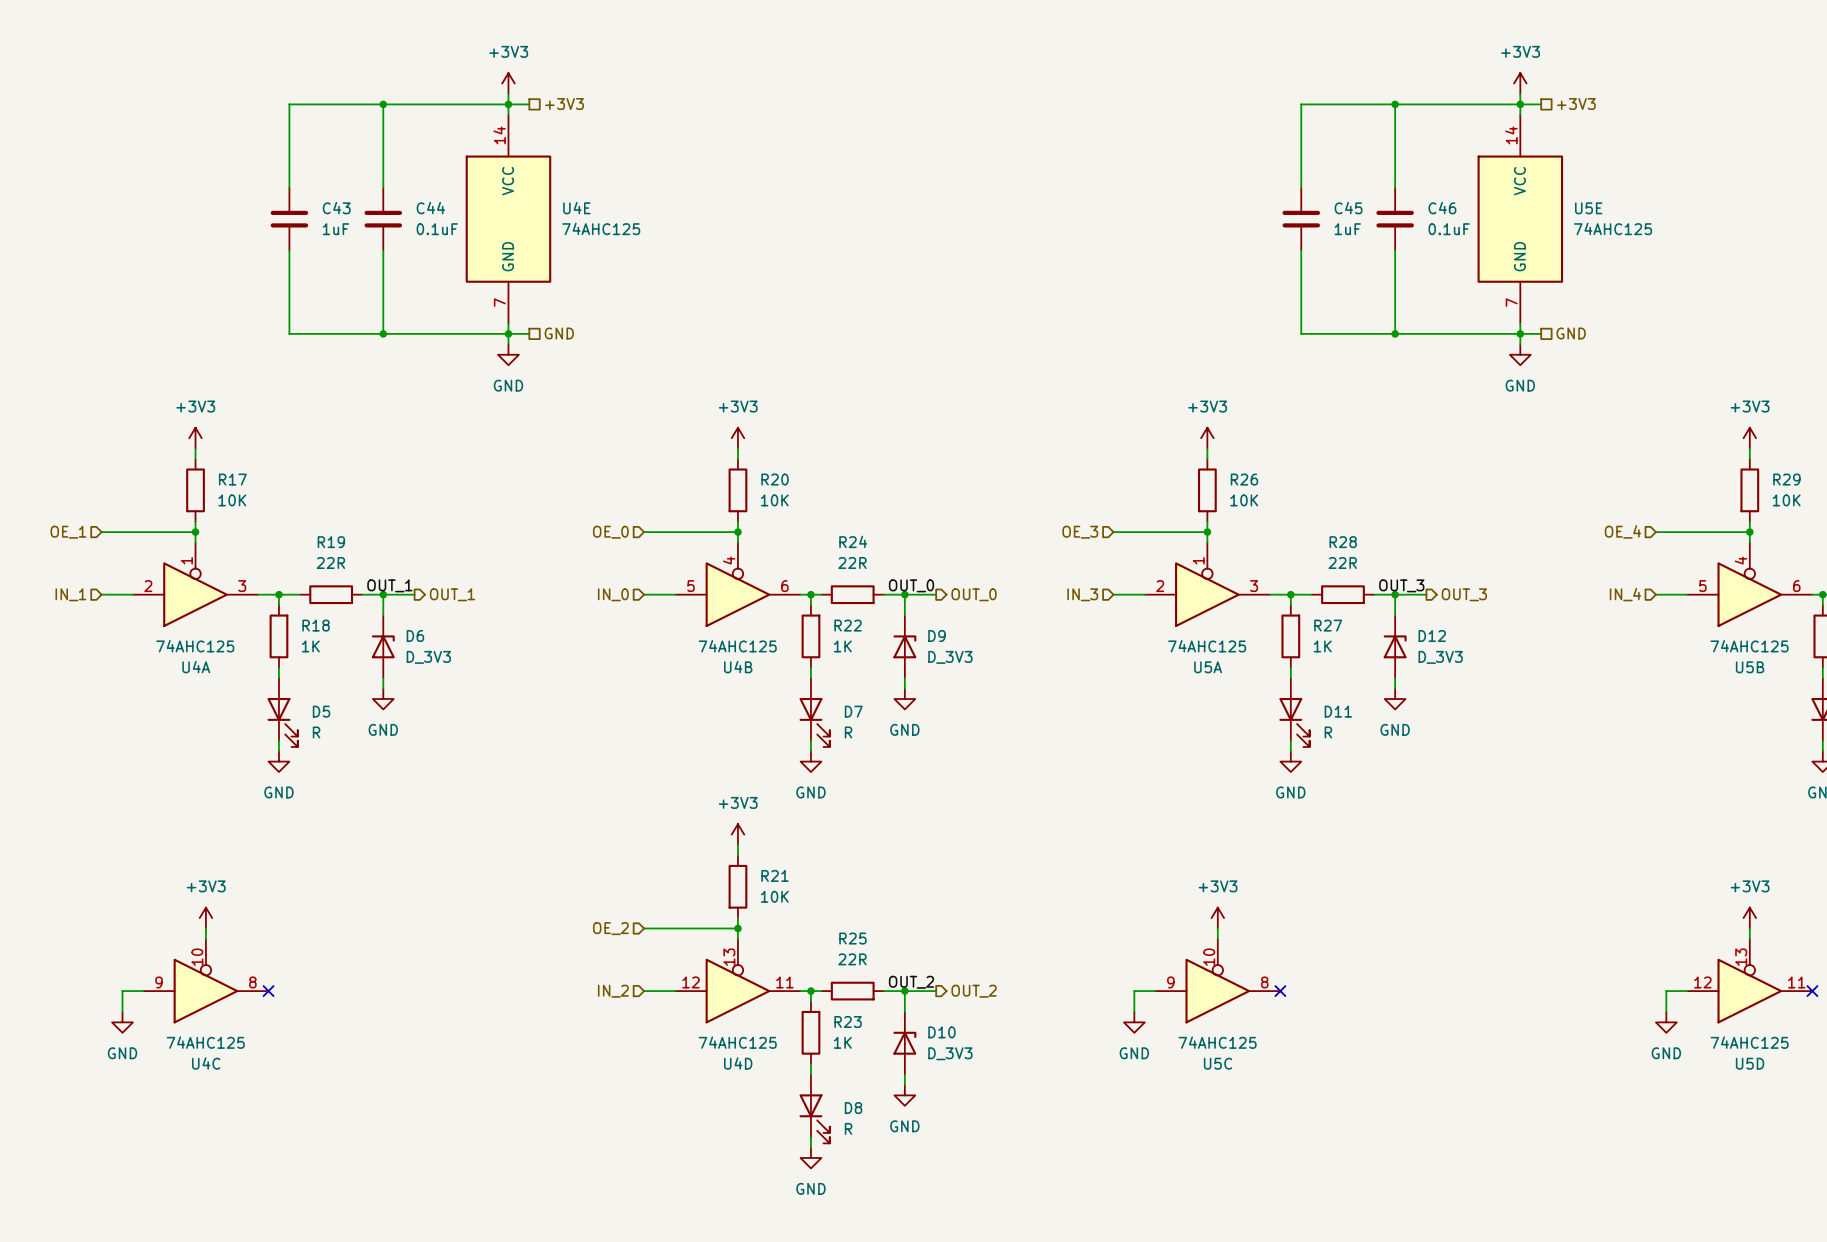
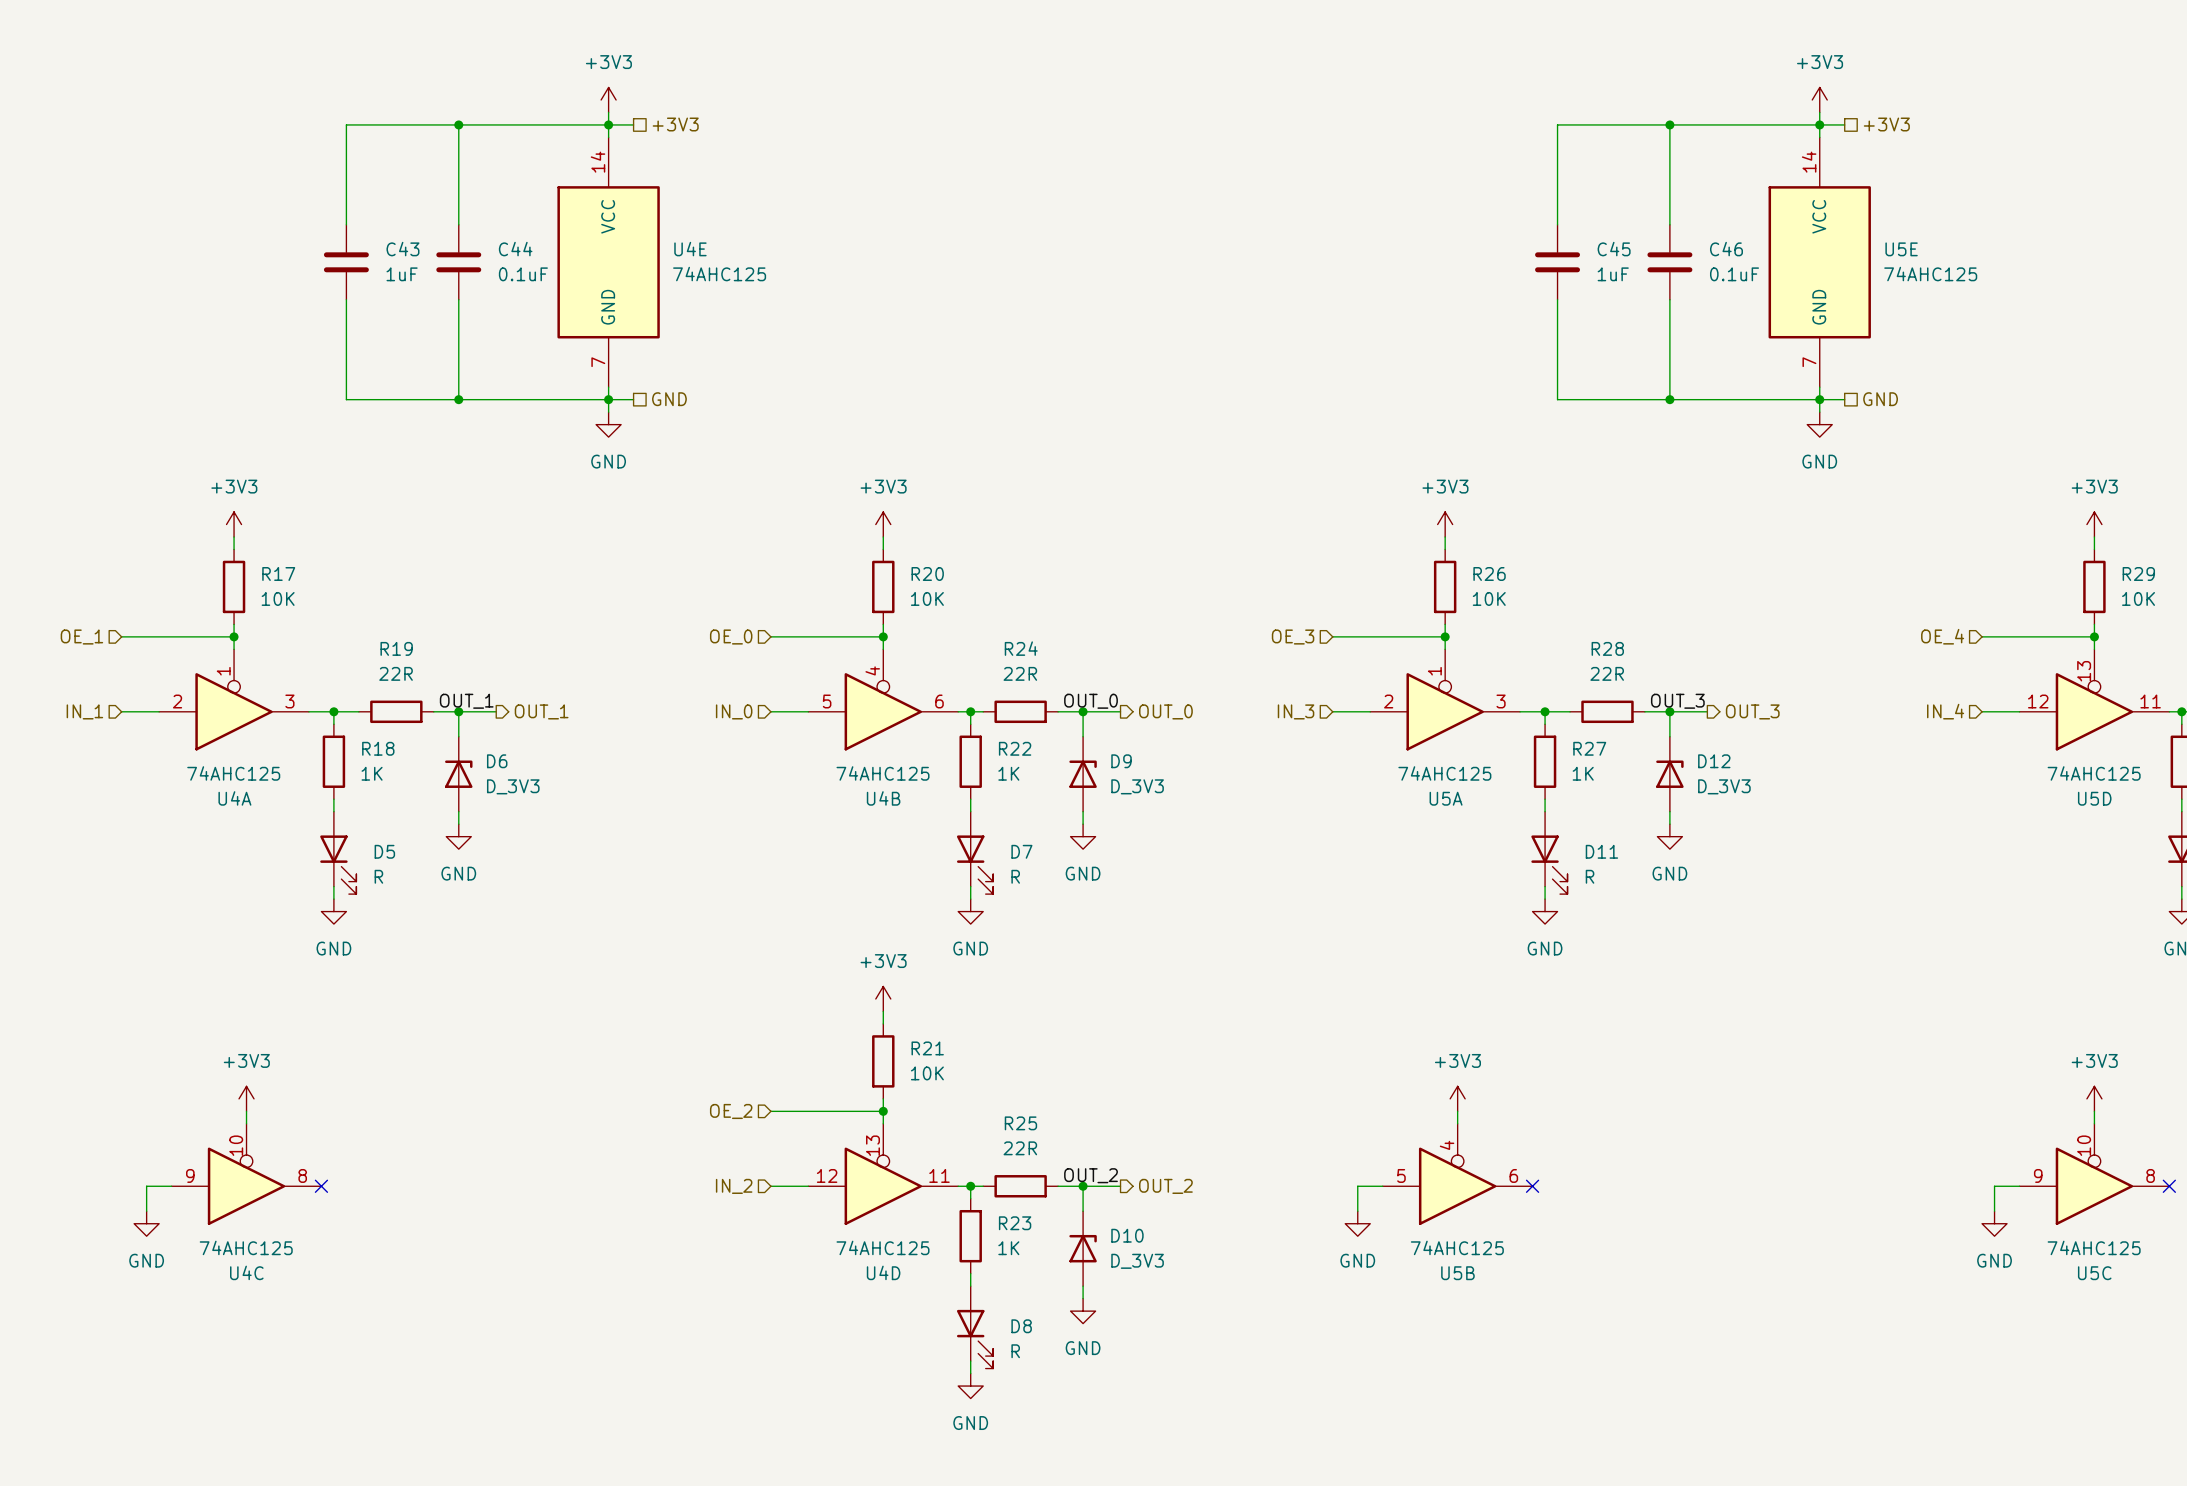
U5B position: (1749, 584) -> (1457, 1174)
U5C position: (1217, 981) -> (2094, 1174)
U5D position: (1749, 981) -> (2094, 699)

